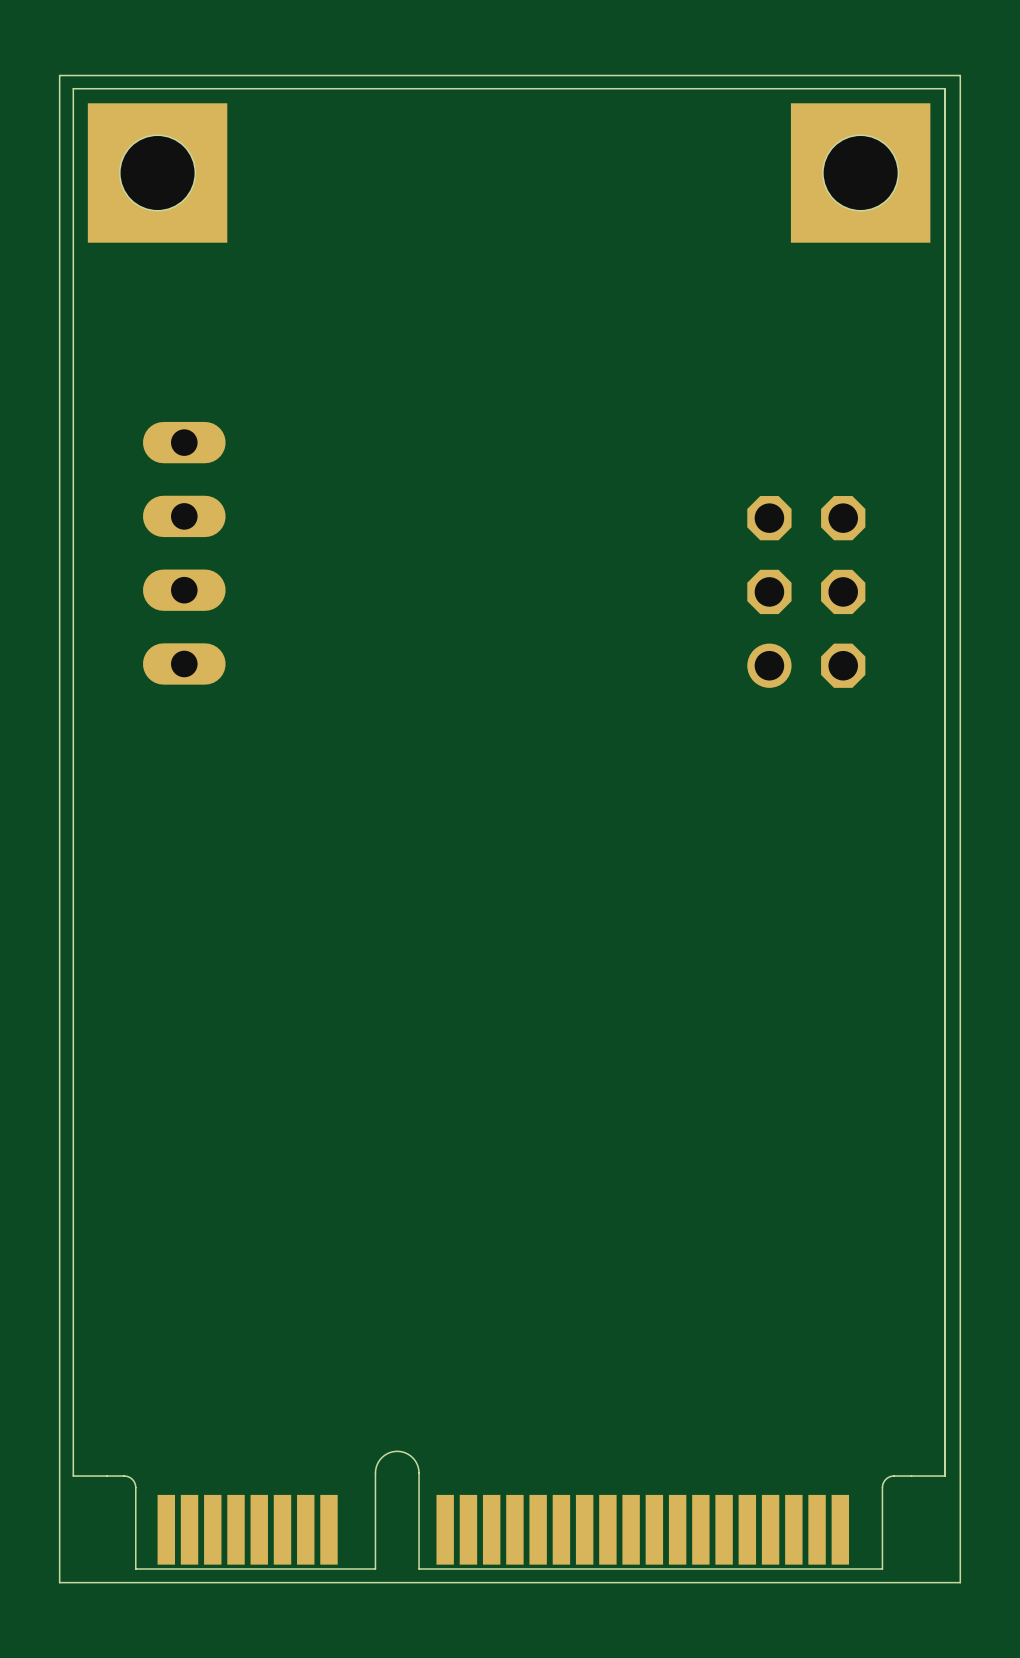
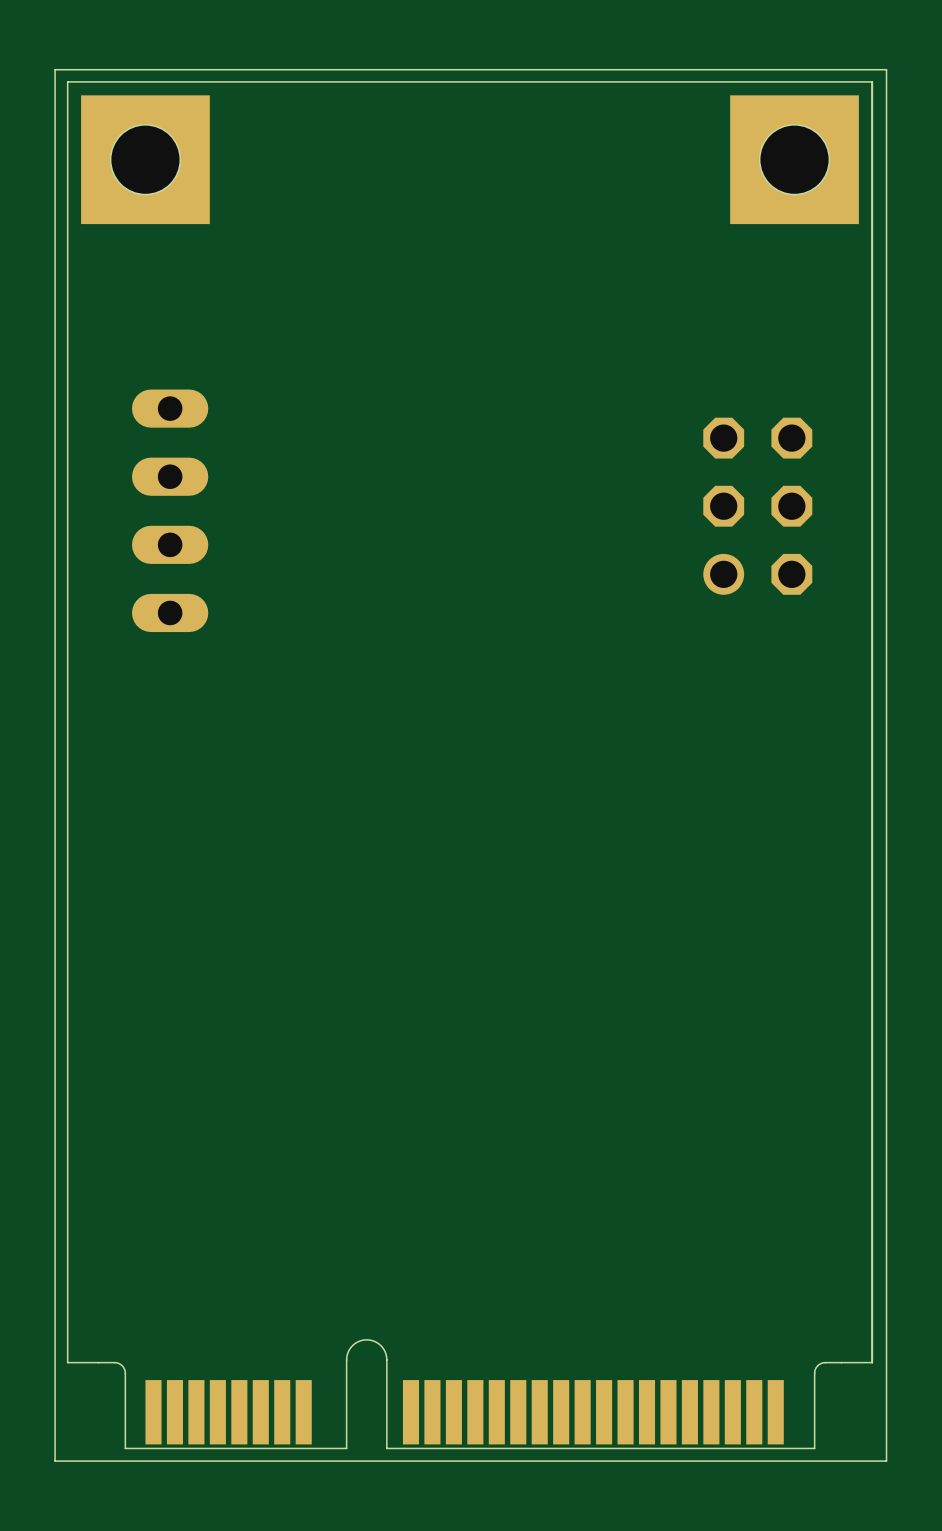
part position: (806, 591) -> (757, 506)

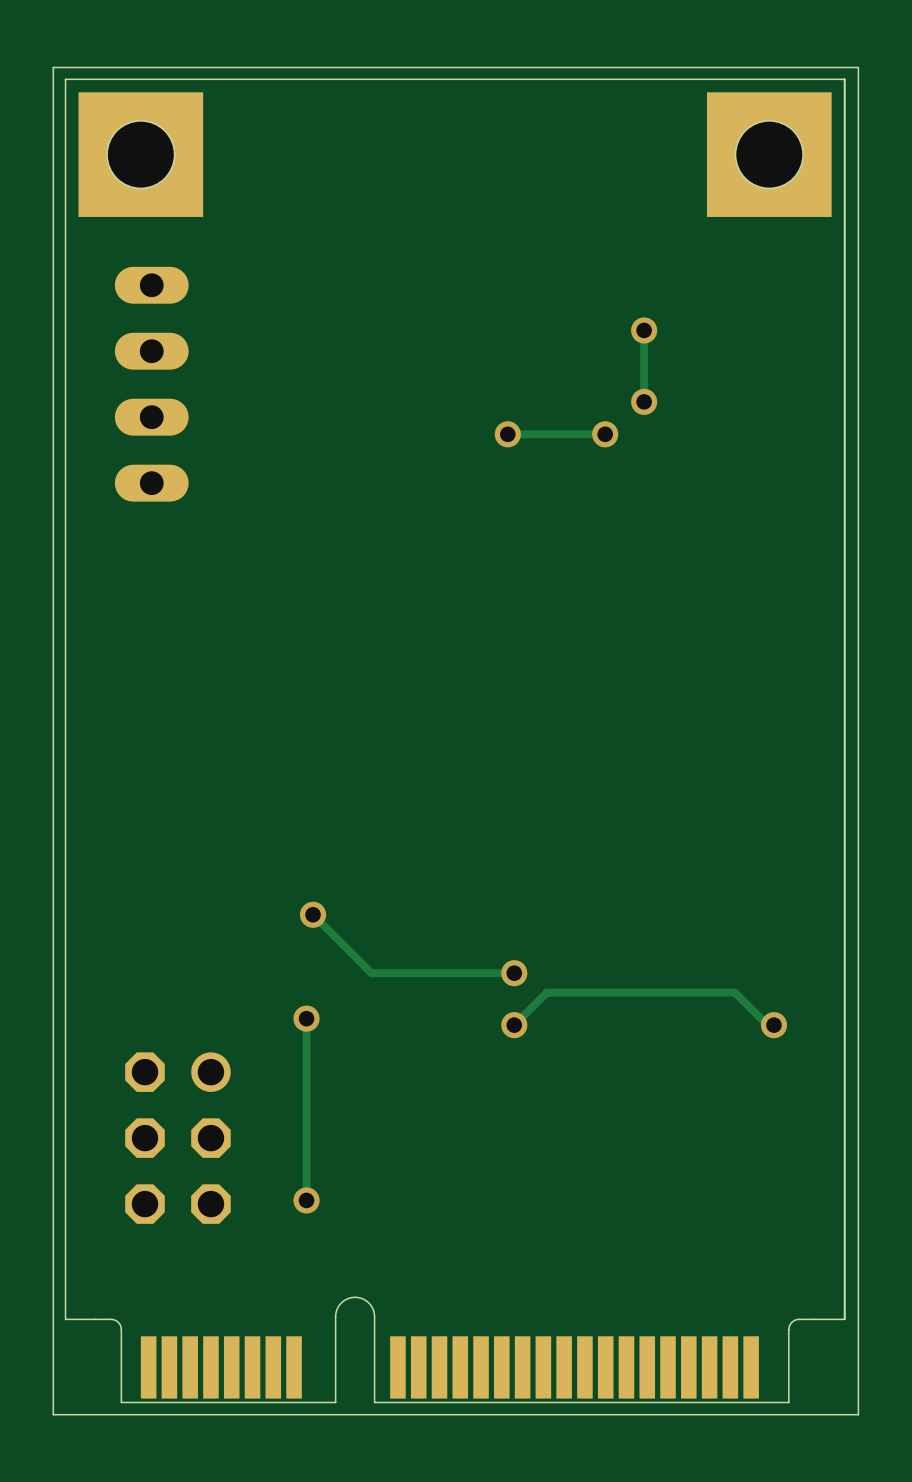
track: none -> (644, 330) (644, 401)
via: none -> (644, 330)
via: none -> (644, 401)
track: none -> (507, 434) (605, 434)
via: none -> (507, 434)
via: none -> (605, 434)
part: (757, 506) -> none
part position: (170, 510) -> (151, 384)
track: none -> (313, 914) (371, 973) (514, 973)
via: none -> (313, 914)
via: none -> (514, 973)
track: none -> (306, 1018) (306, 1200)
via: none -> (306, 1018)
track: none -> (514, 1025) (546, 992) (735, 992) (767, 1025) (773, 1025)
via: none -> (514, 1025)
via: none -> (773, 1025)
part: none -> (177, 1138)
via: none -> (306, 1200)

